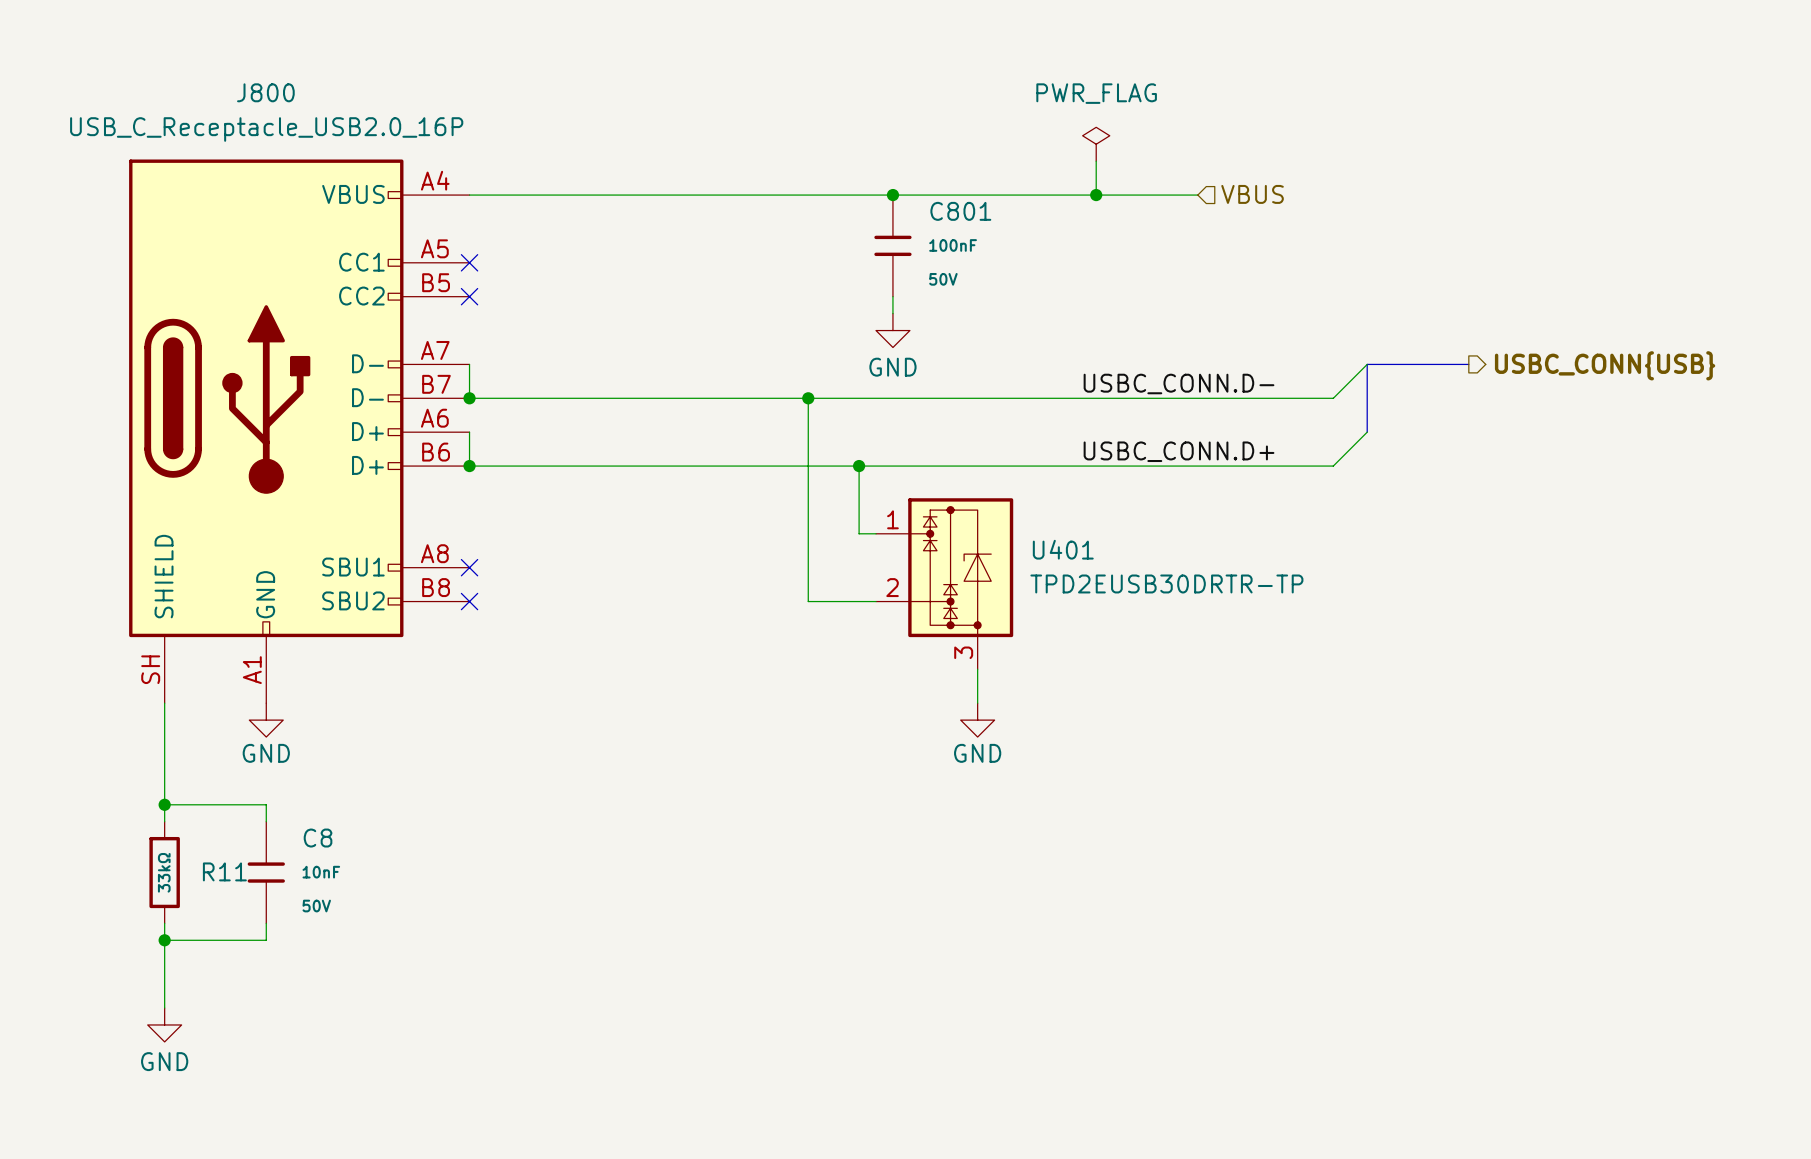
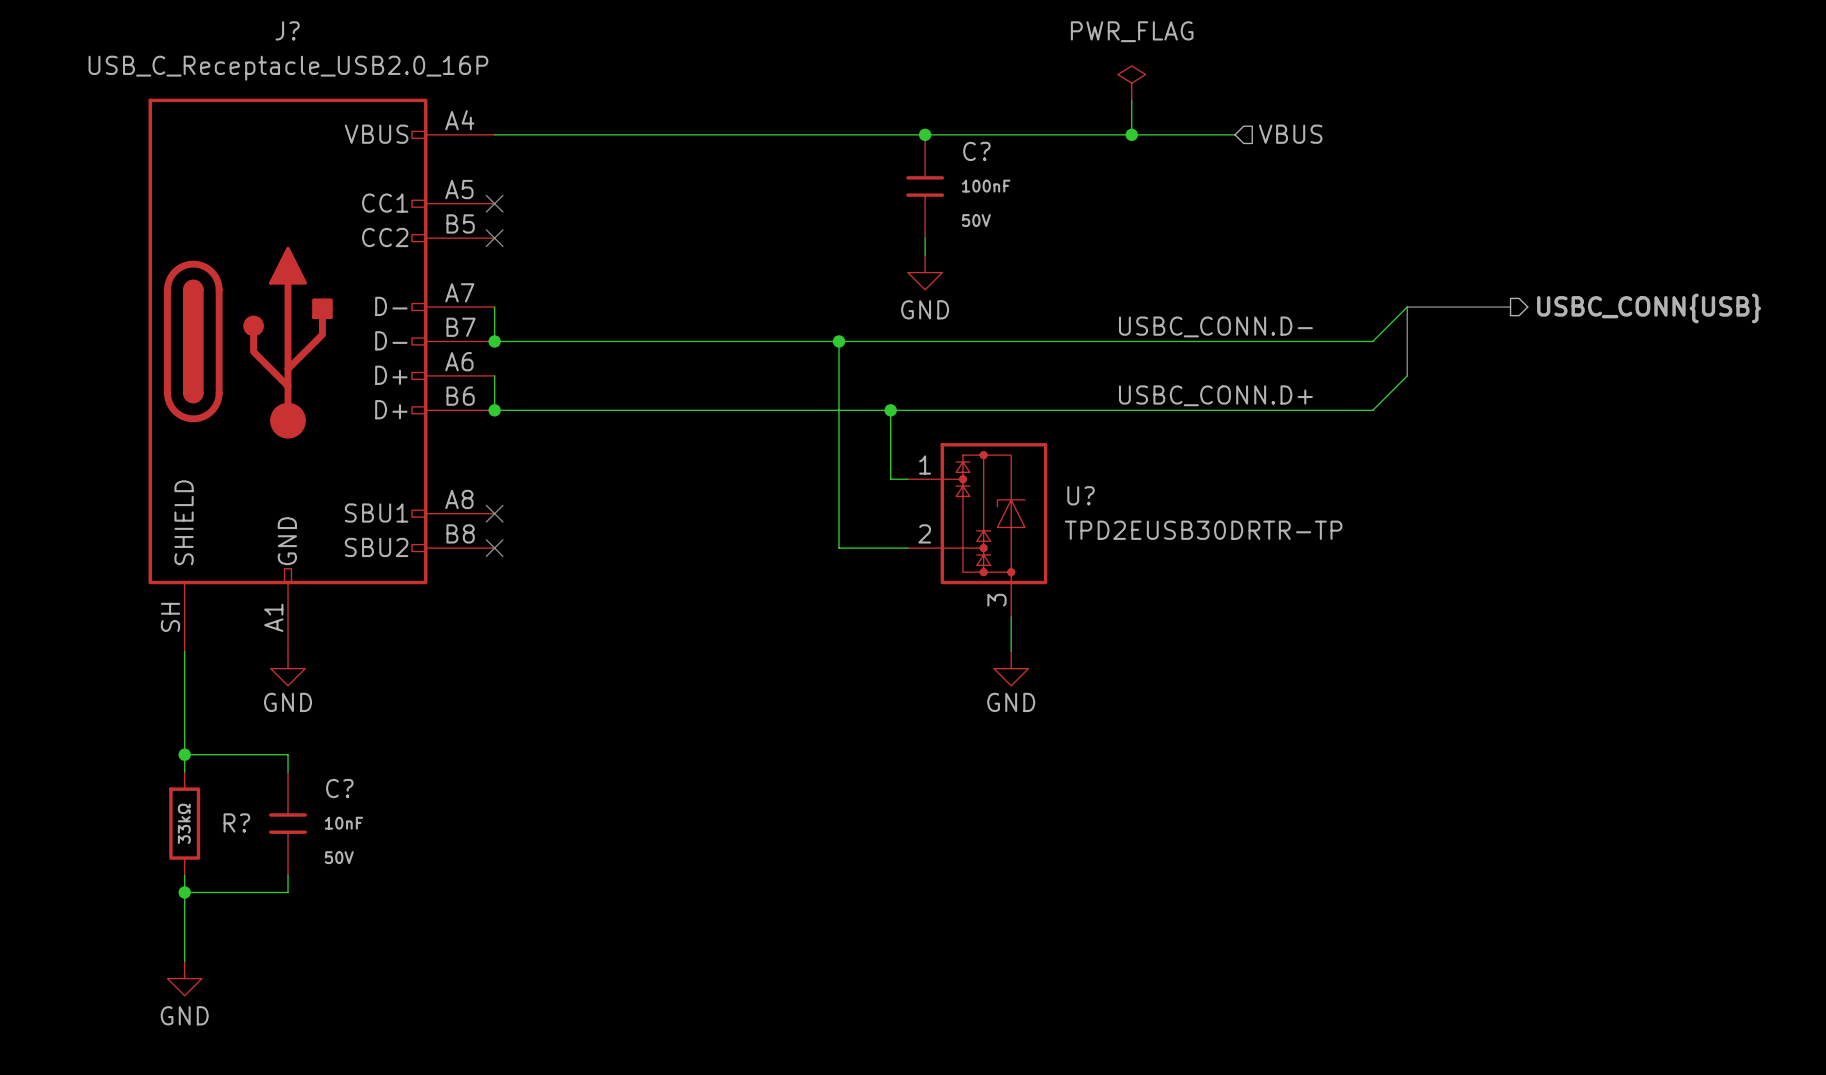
J800 name: J800 (265, 92) -> J? (287, 30)
C801 name: C801 (960, 211) -> C? (976, 151)
U401 name: U401 (1063, 549) -> U? (1081, 495)
C8 name: C8 (318, 838) -> C? (339, 788)
R11 name: R11 (224, 871) -> R? (236, 822)

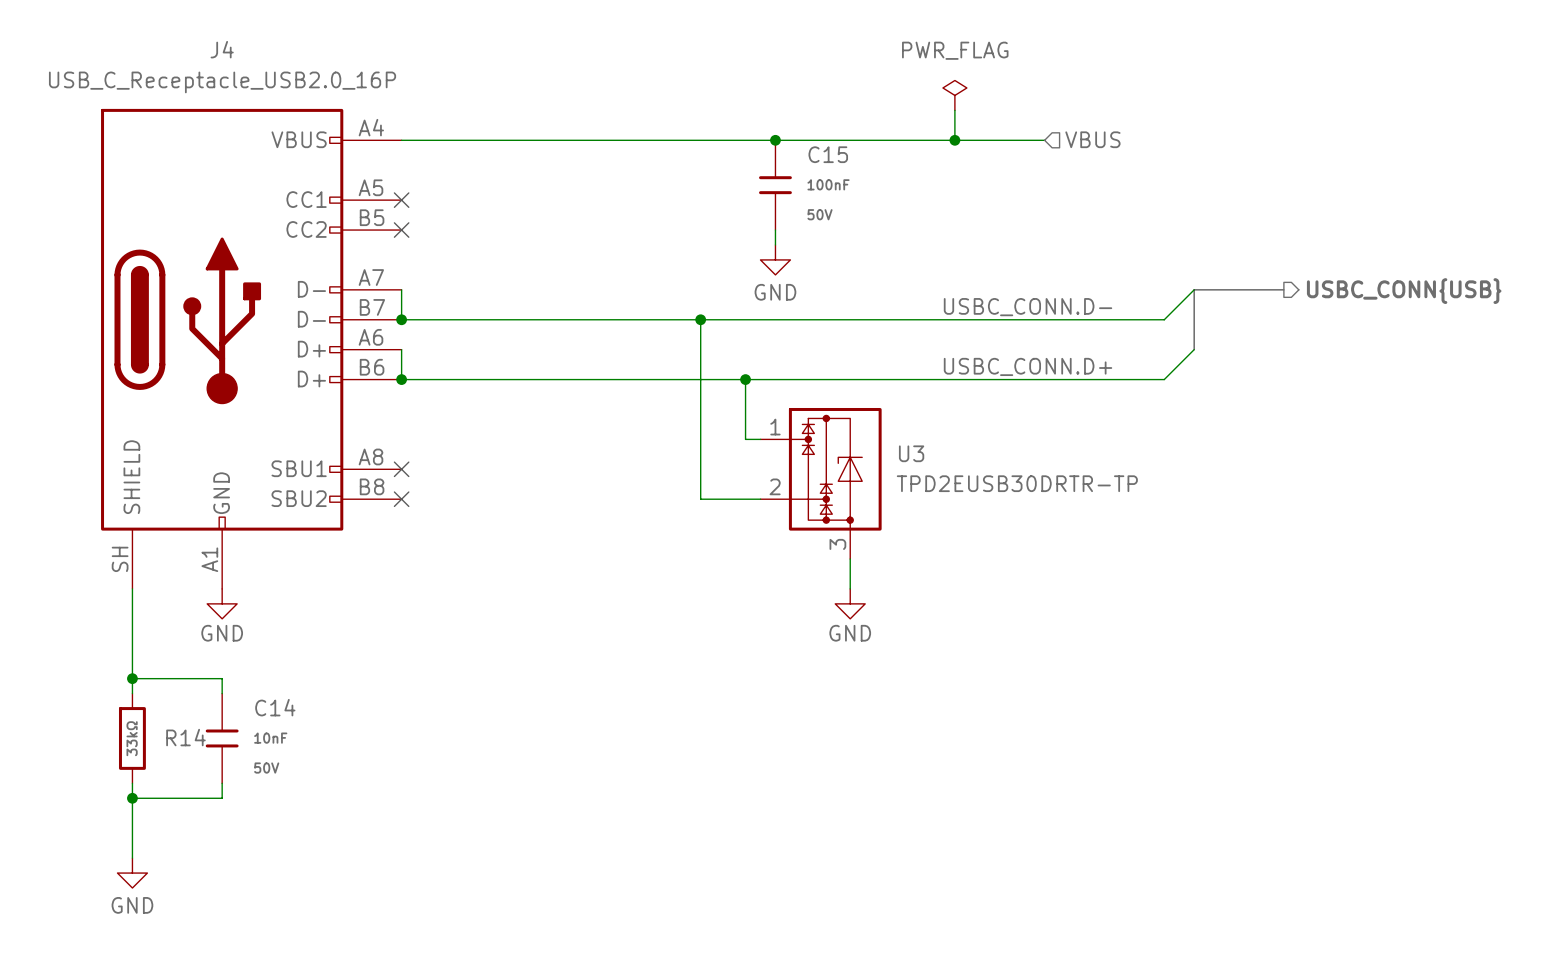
J? name: J? (287, 30) -> J4 (222, 49)
C? name: C? (976, 151) -> C15 (828, 154)
U? name: U? (1081, 495) -> U3 (911, 453)
C? name: C? (339, 788) -> C14 (275, 707)
R? name: R? (236, 822) -> R14 (185, 737)

